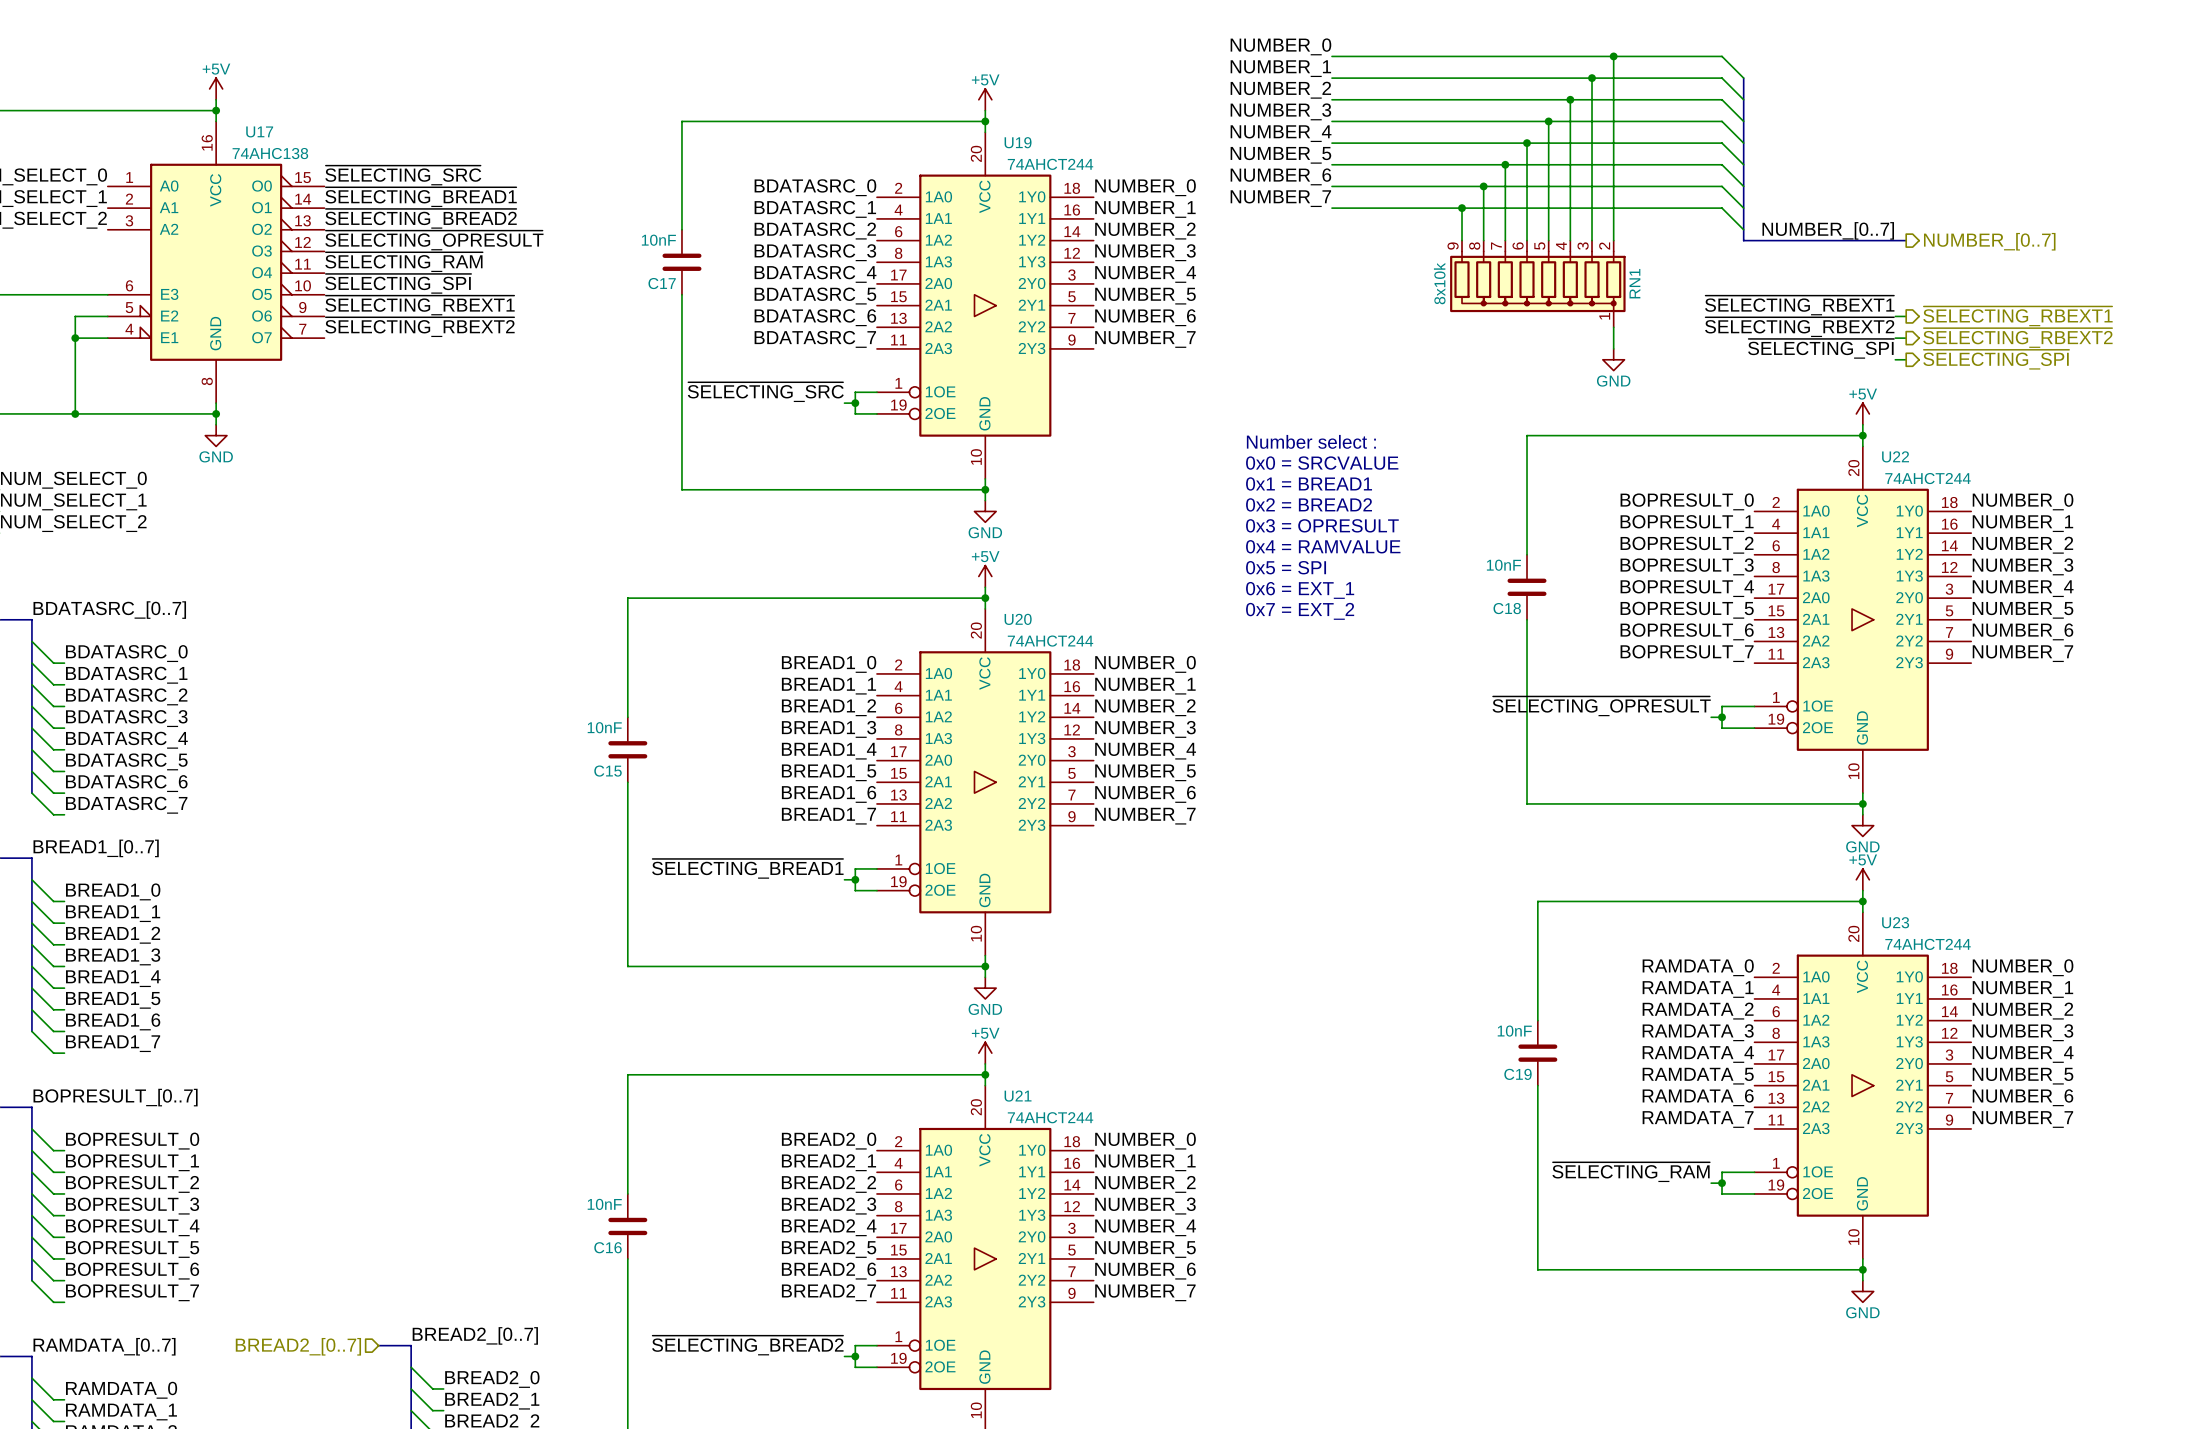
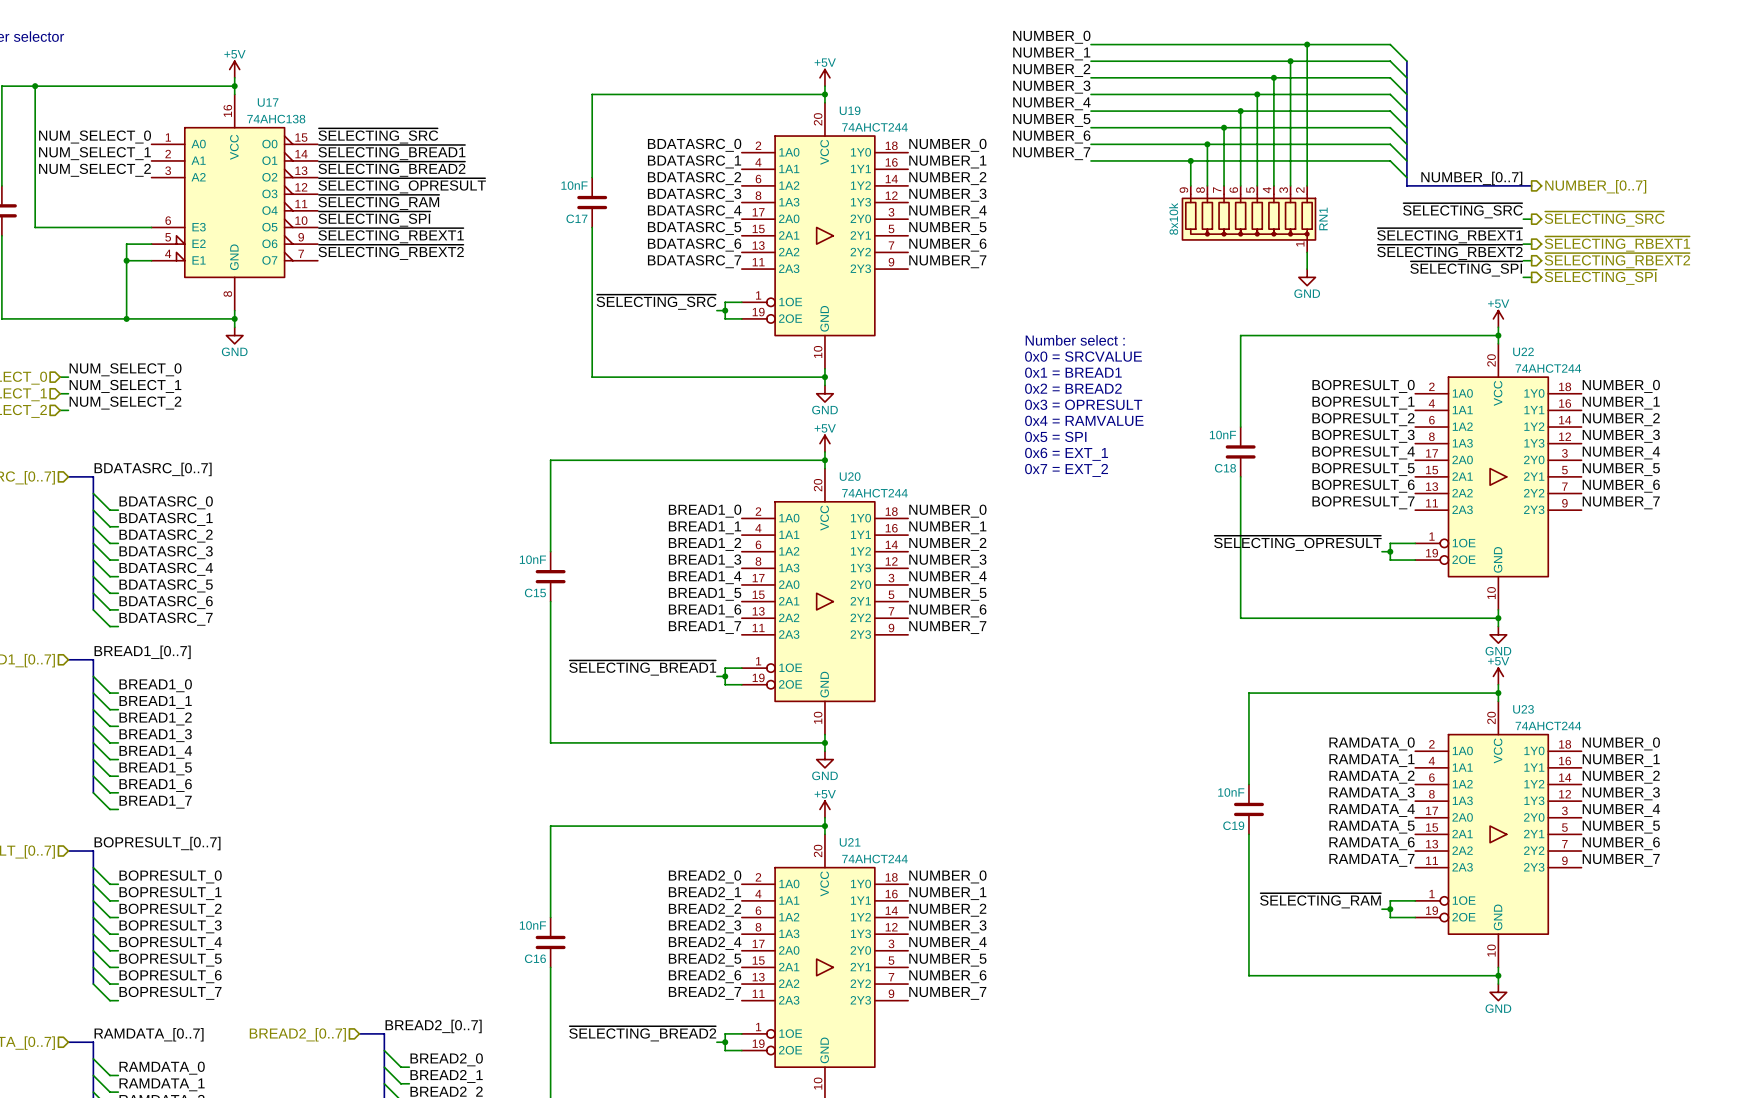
label: none -> ~{SELECTING_SRC} (1462, 210)
wire: none -> (1523, 219) (1531, 219)
hierarchical label: none -> ~{SELECTING_SRC} (1604, 219)

